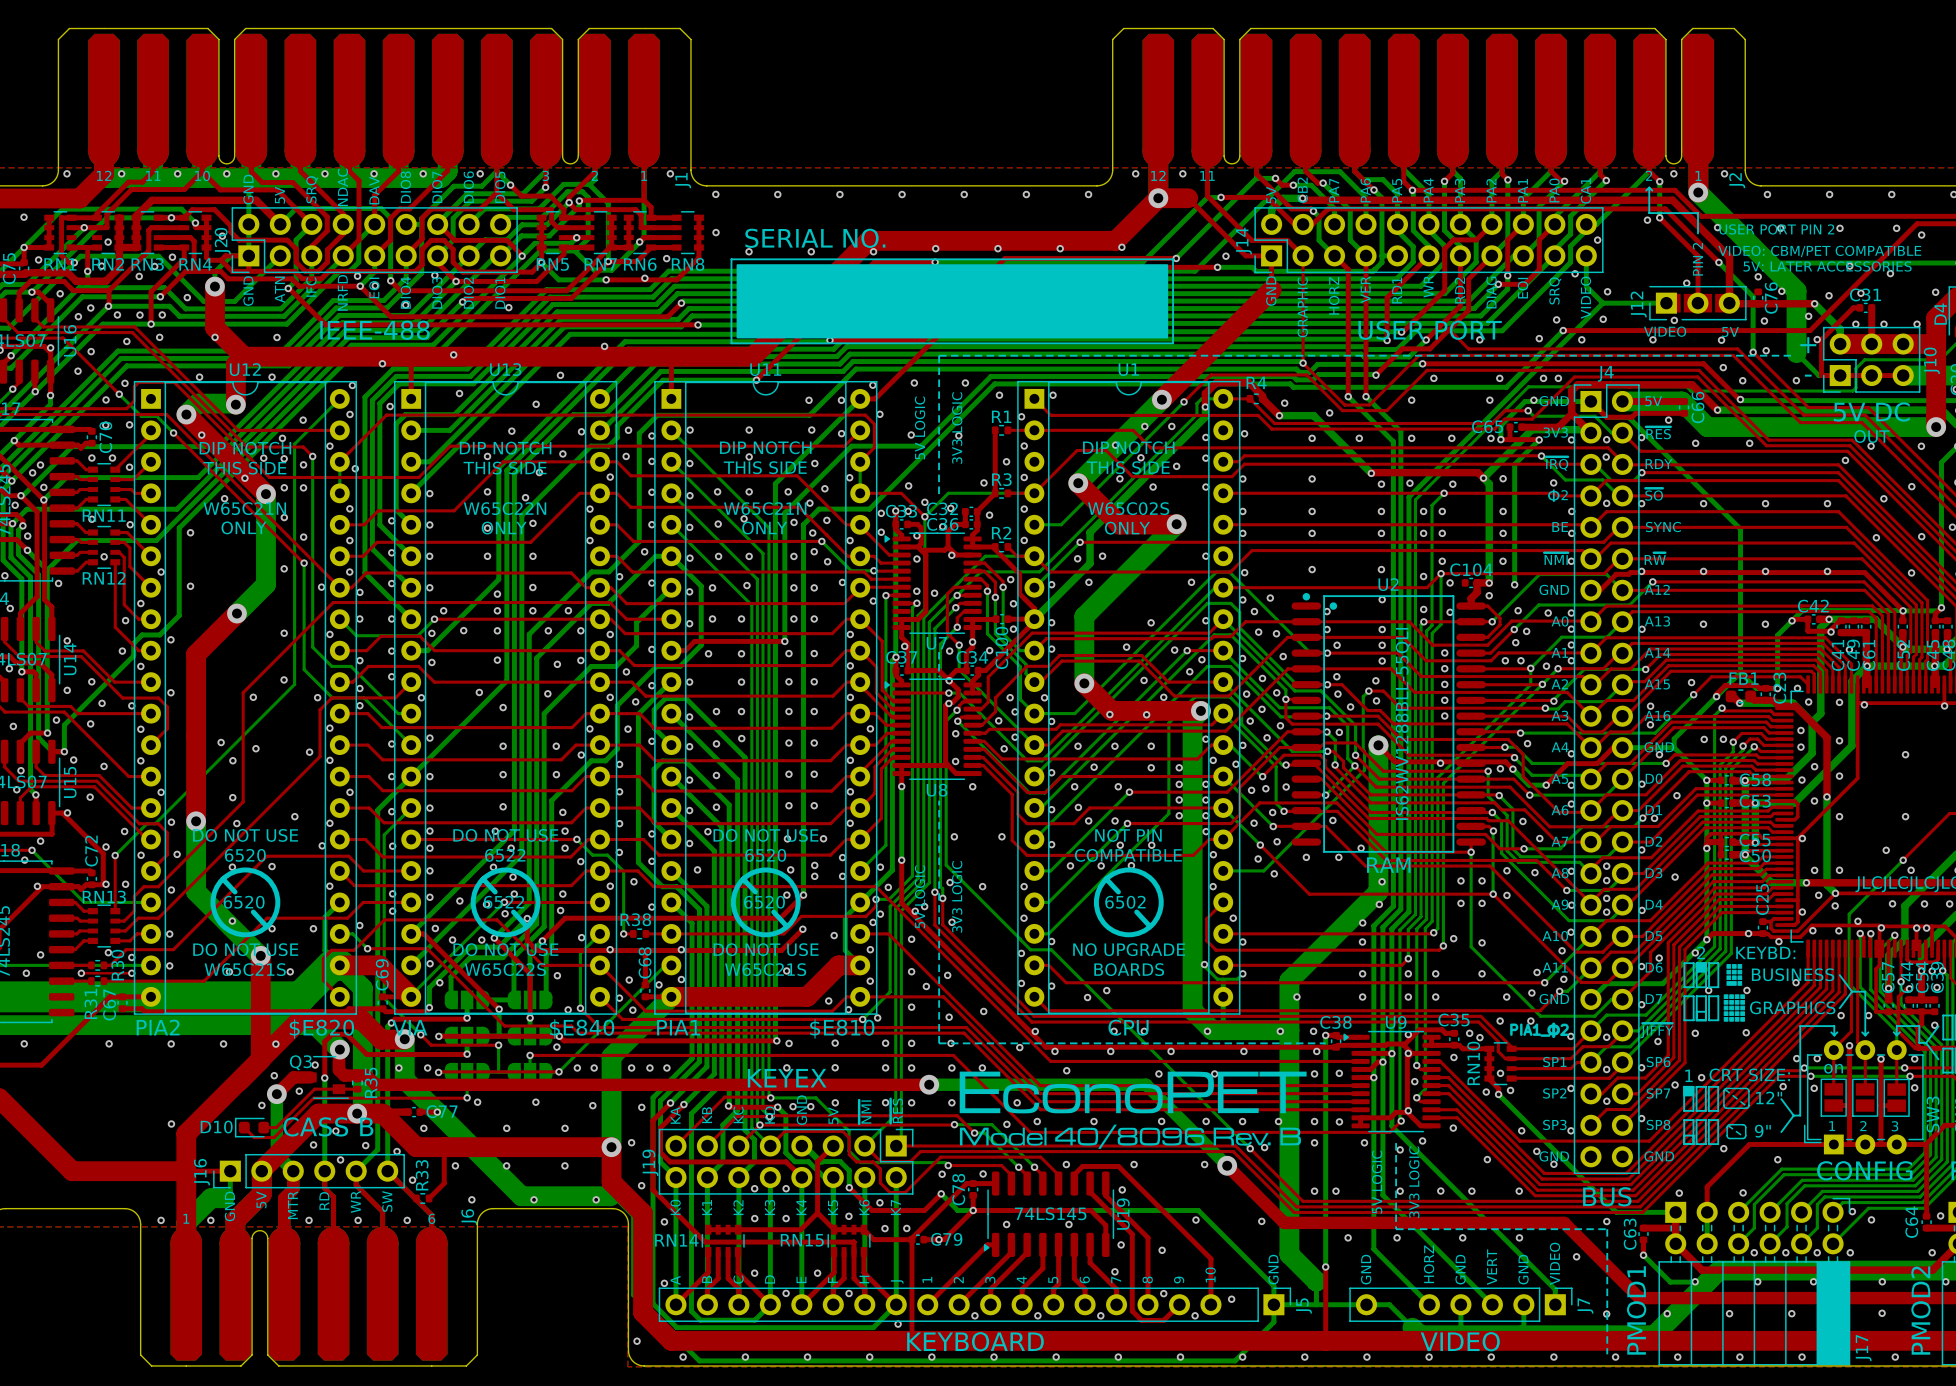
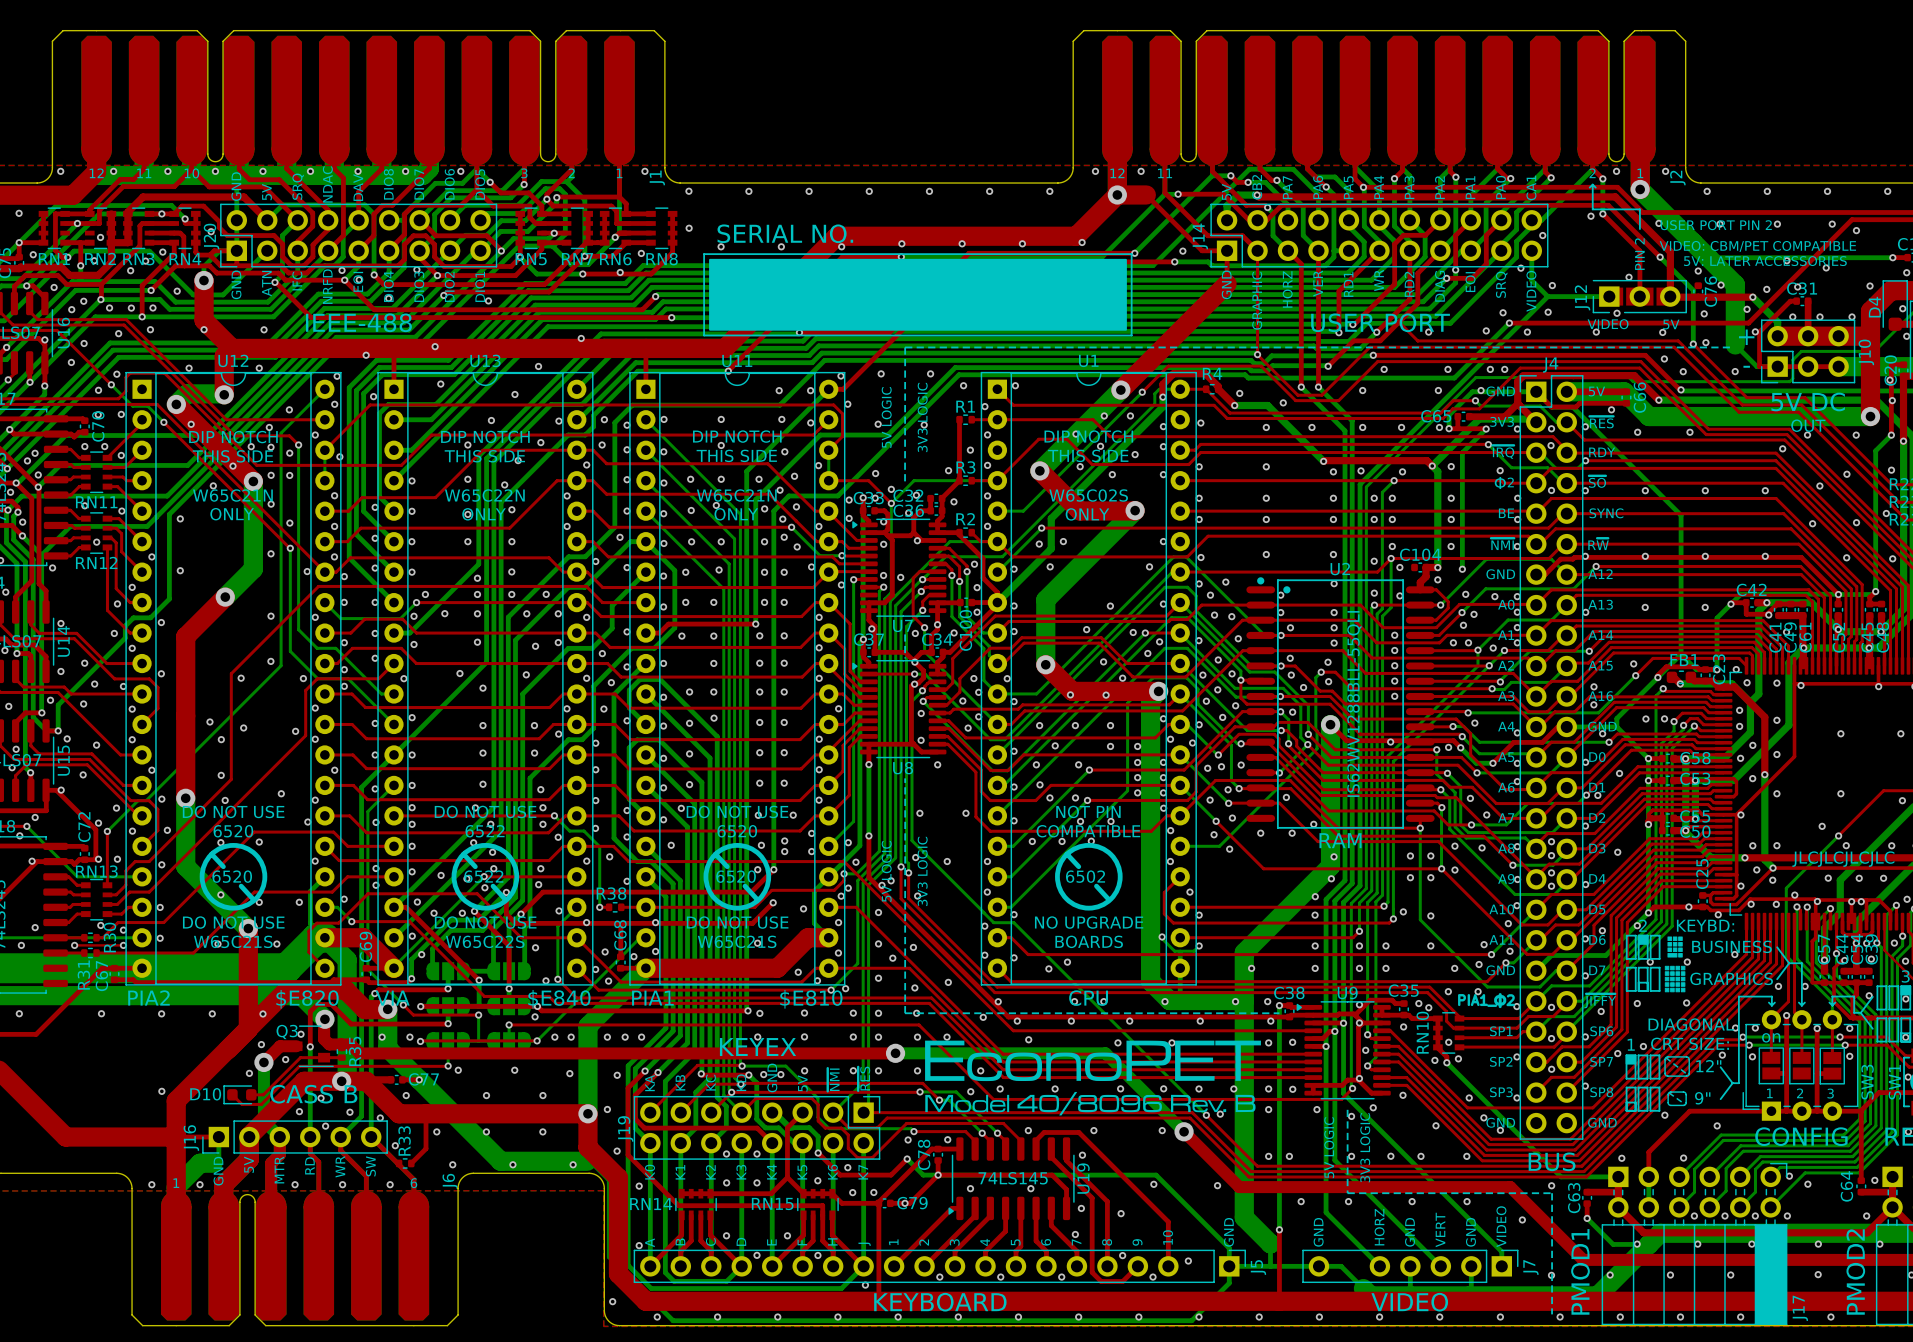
text: none -> DIAGONAL (1691, 1024)

